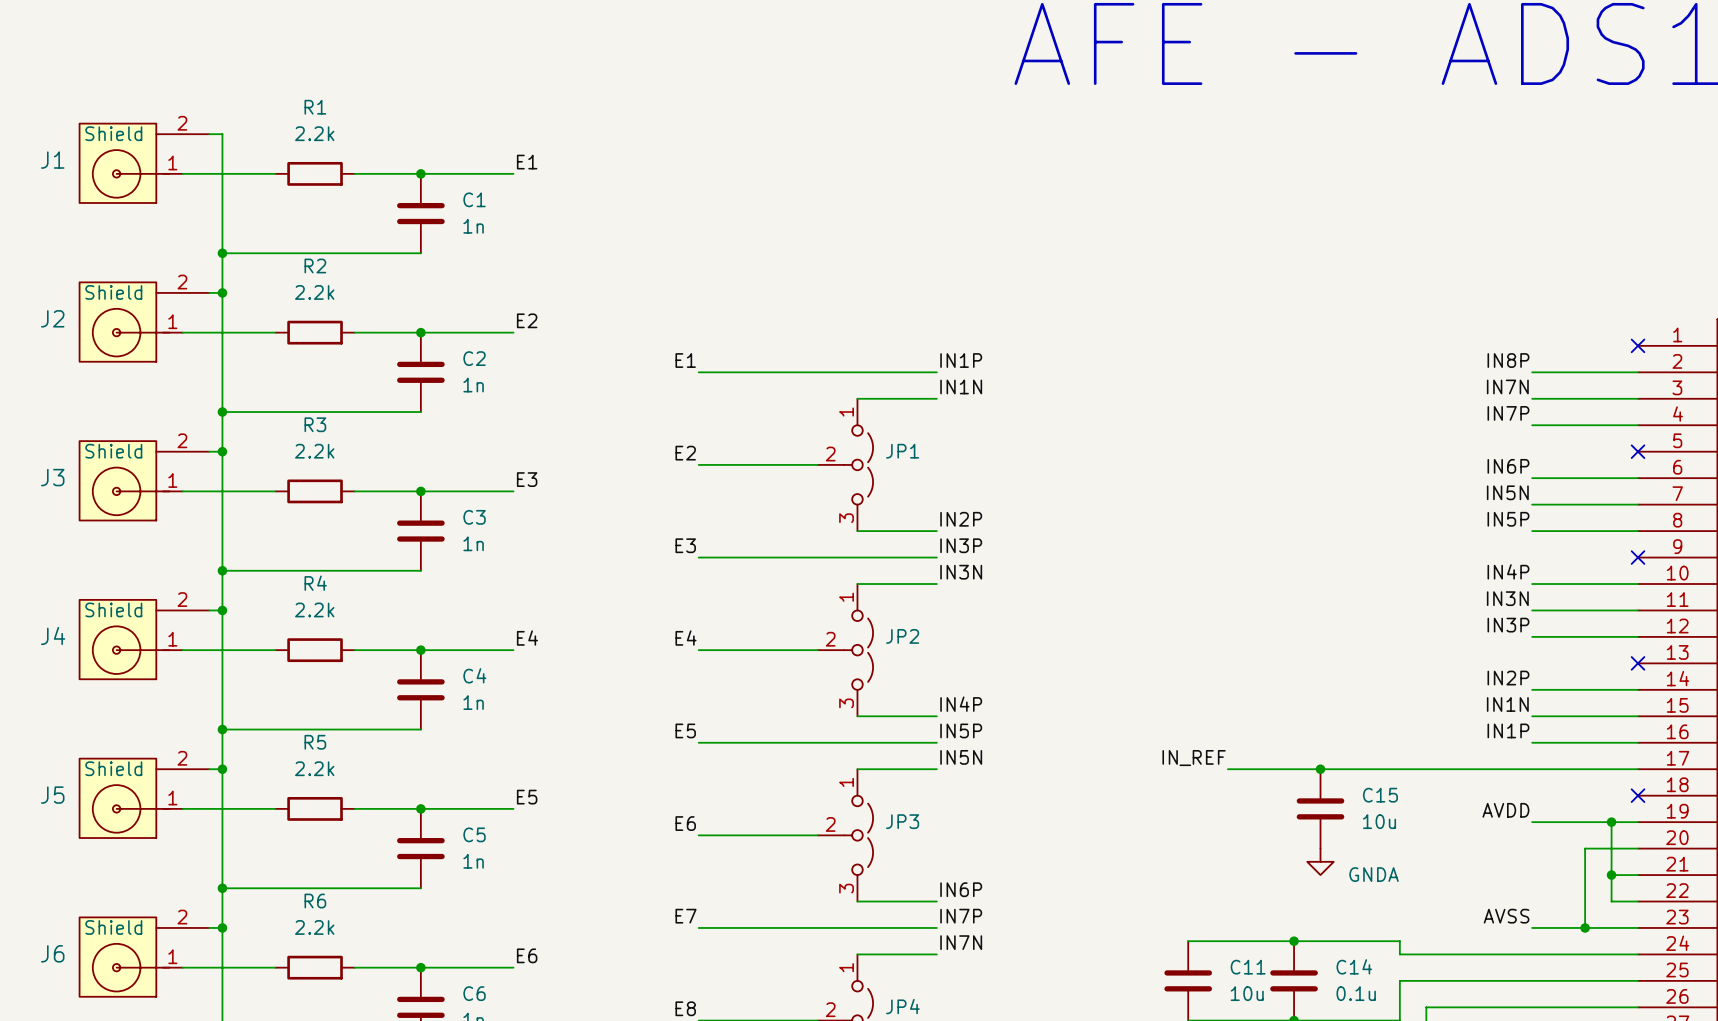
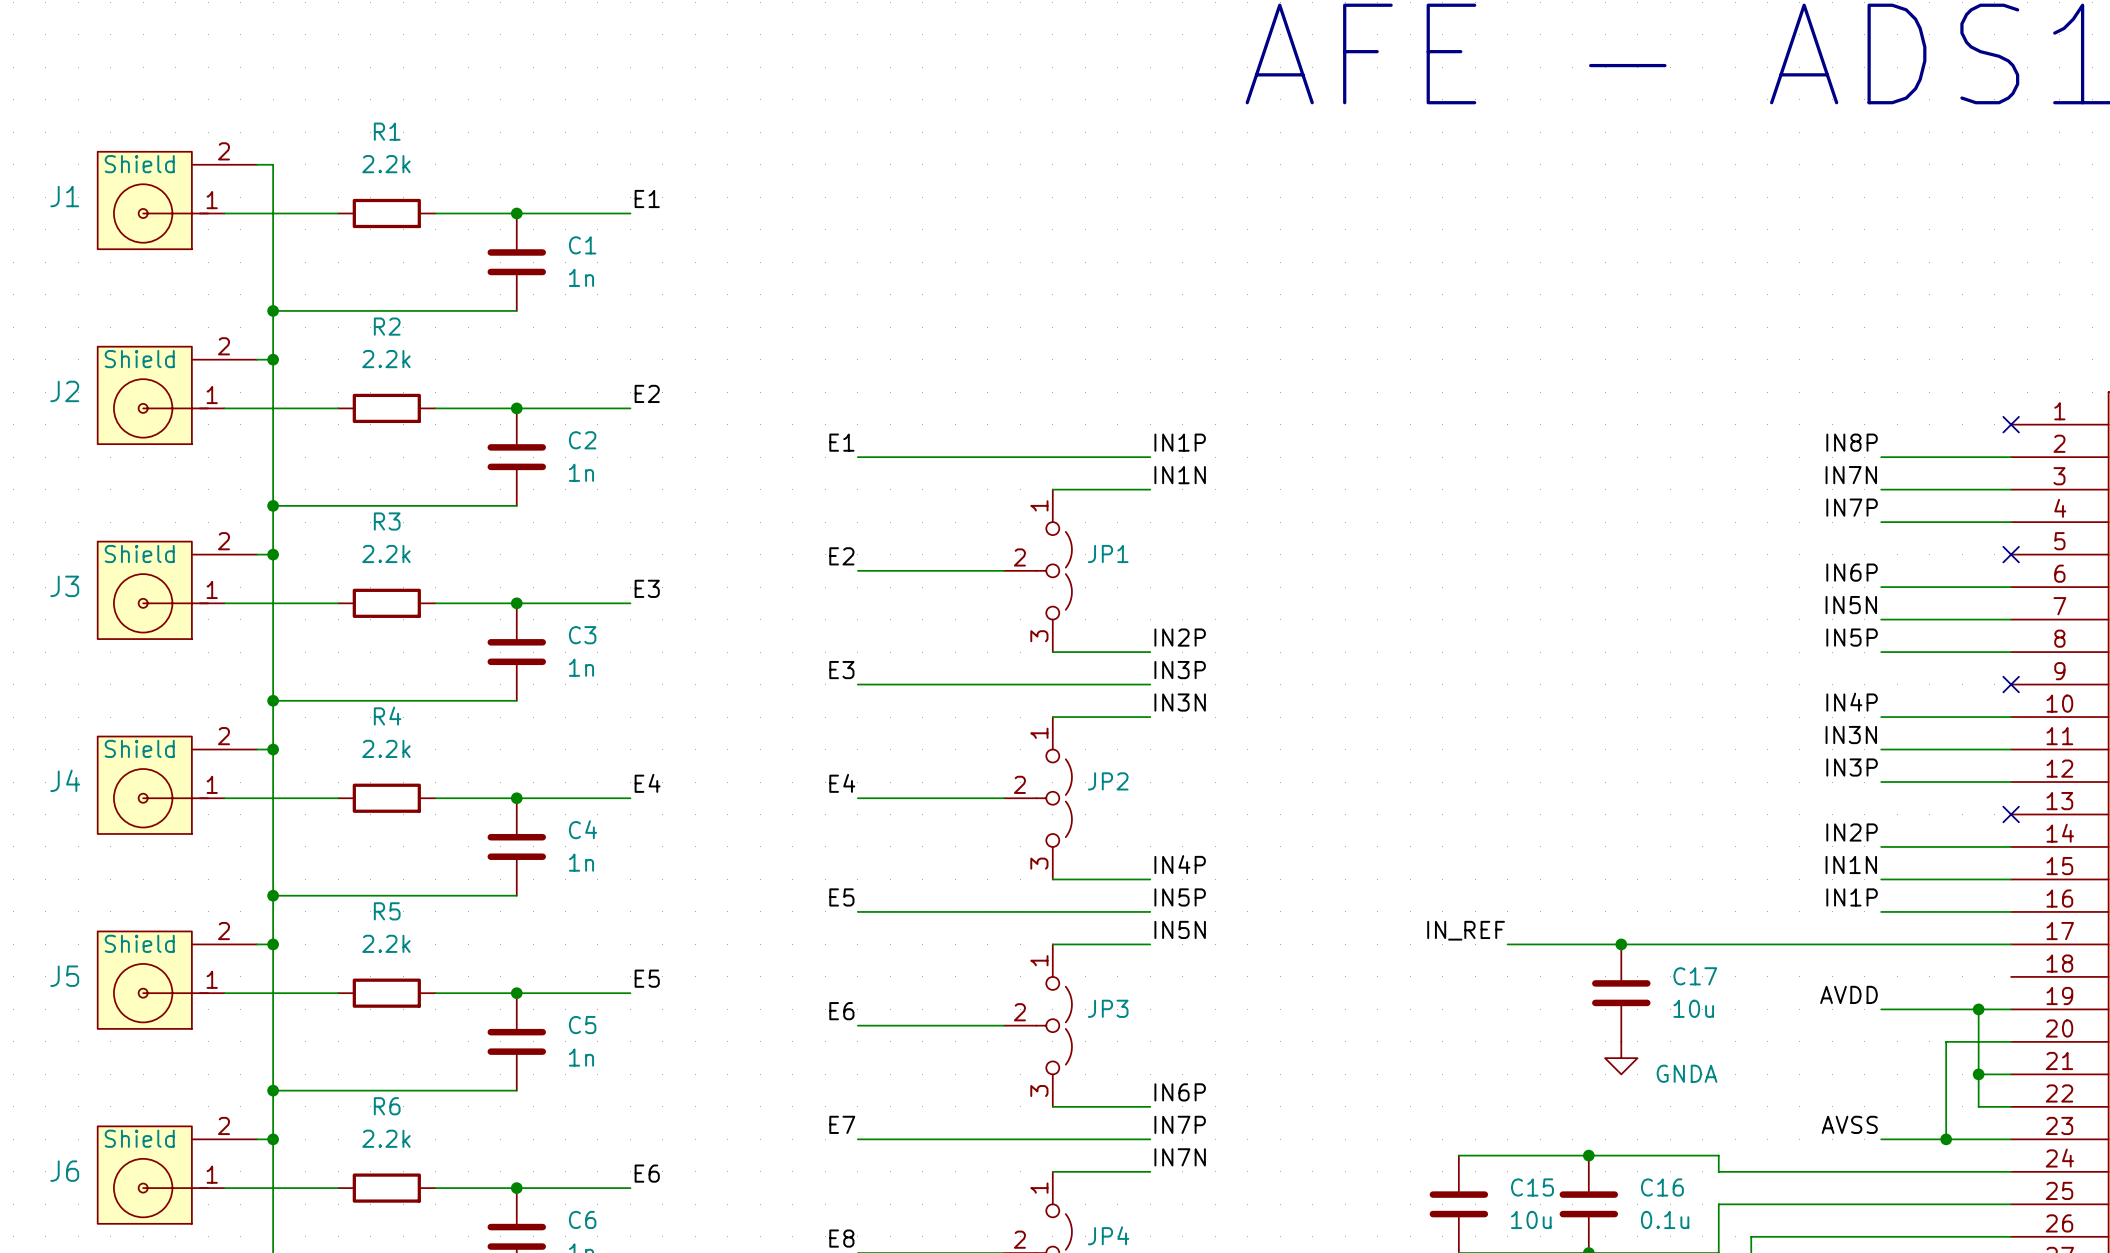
C15 name: C15 (1380, 795) -> C17 (1695, 976)
no-connect mark: (1638, 795) -> none
C14 name: C14 (1354, 966) -> C16 (1662, 1187)
C11 name: C11 (1248, 967) -> C15 (1532, 1187)

